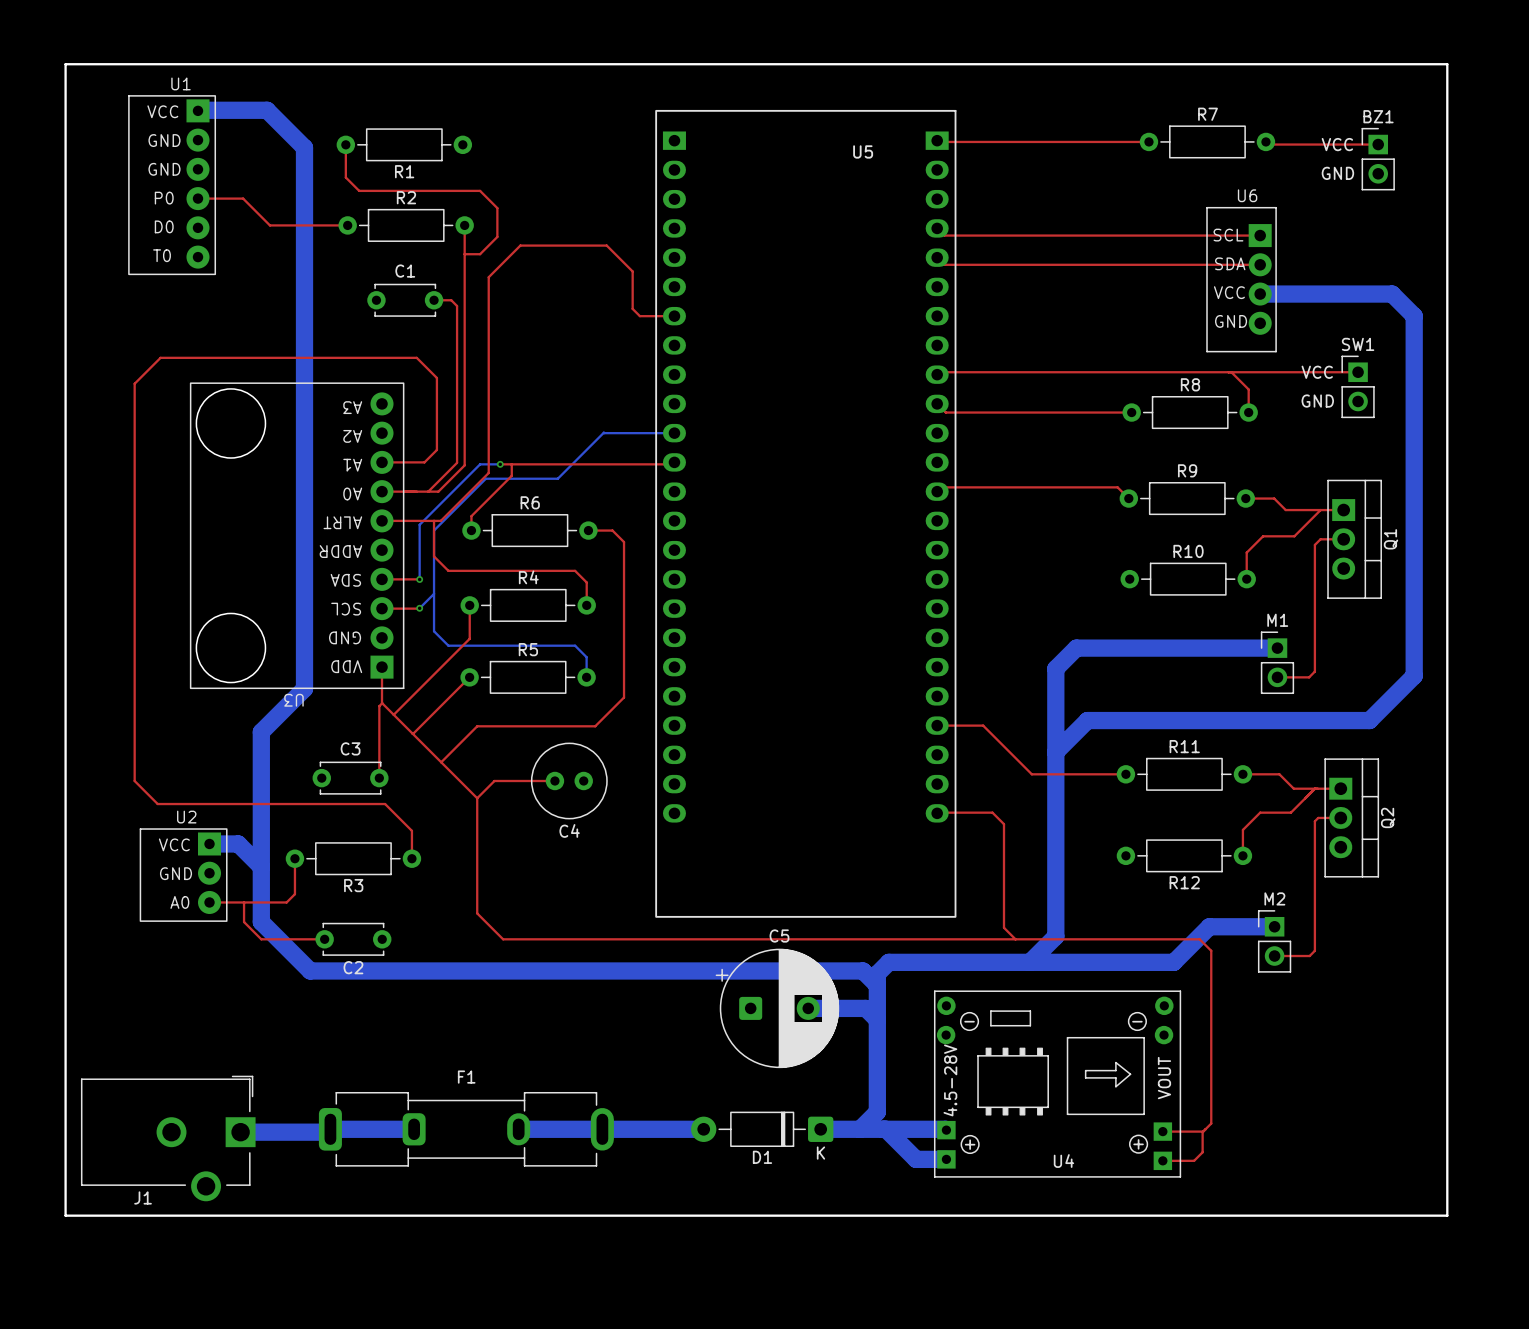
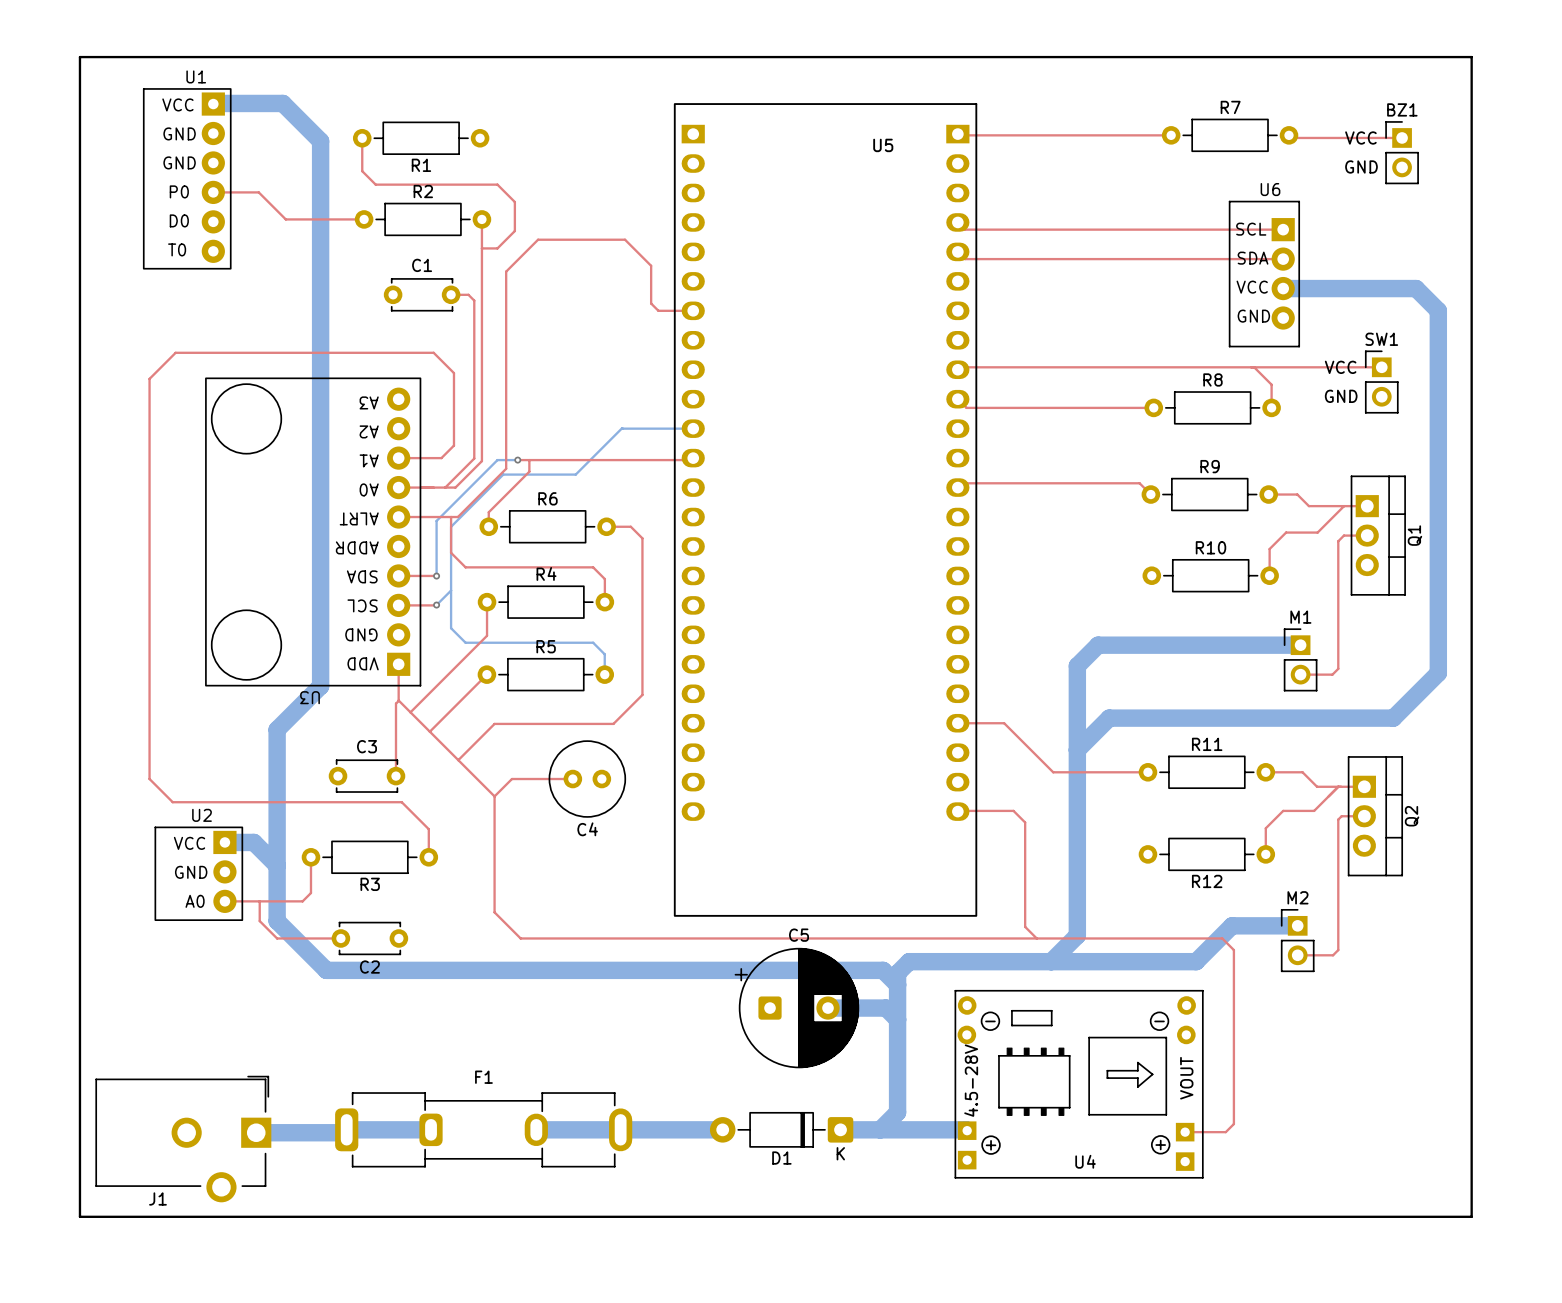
bottom track: (885, 1129) (916, 1159) (946, 1159) -> none
top track: (1203, 1131) (1202, 1152) (1194, 1160) (1162, 1160) -> none

